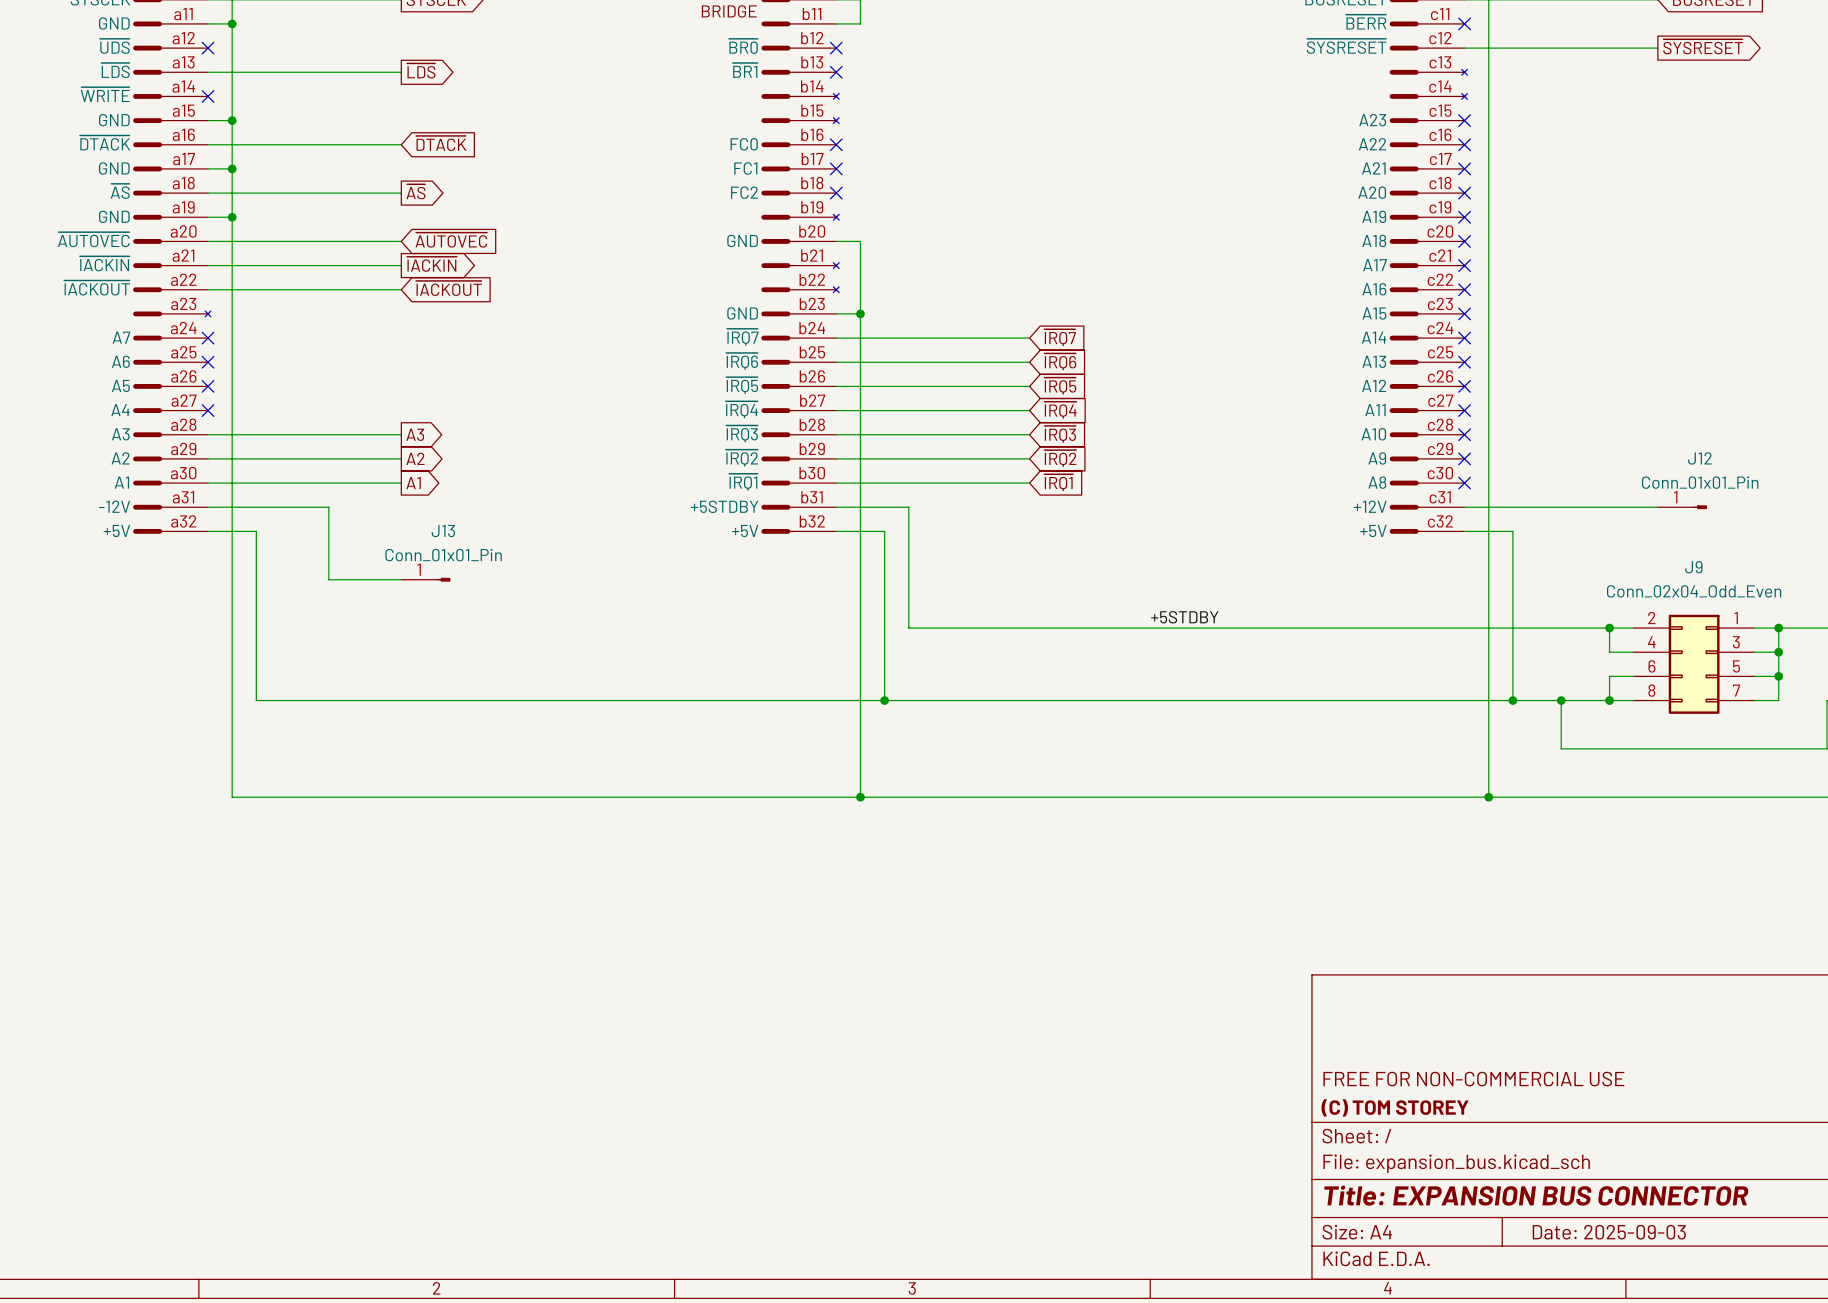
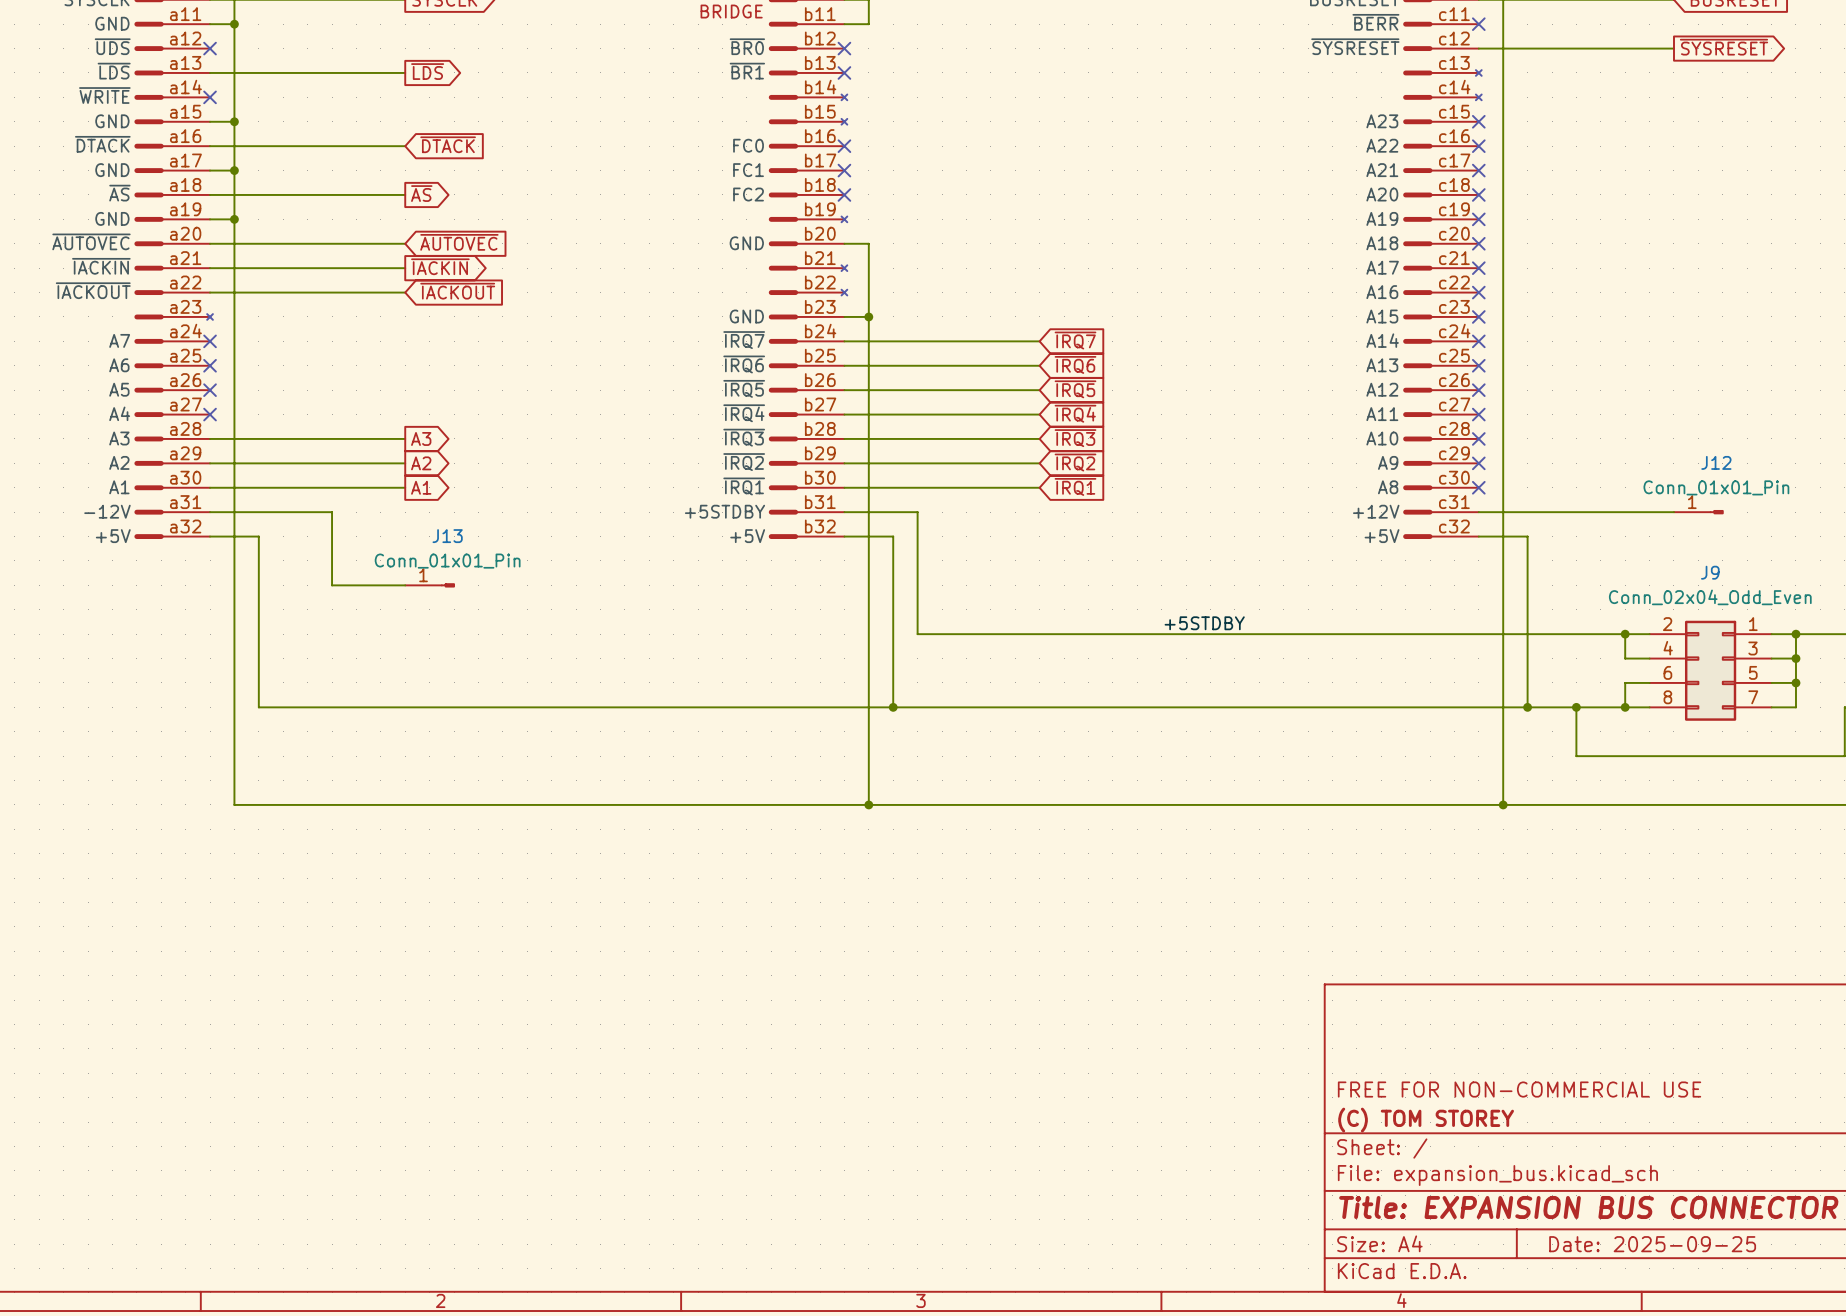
title block: Date: 2025-09-03 (1609, 1232) -> Date: 2025-09-25 (1652, 1244)

